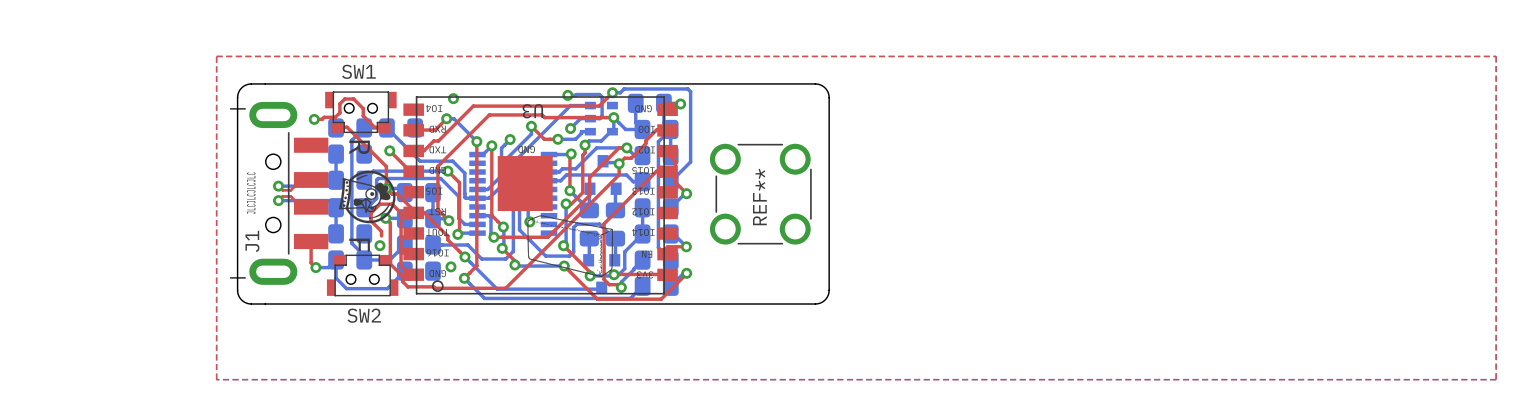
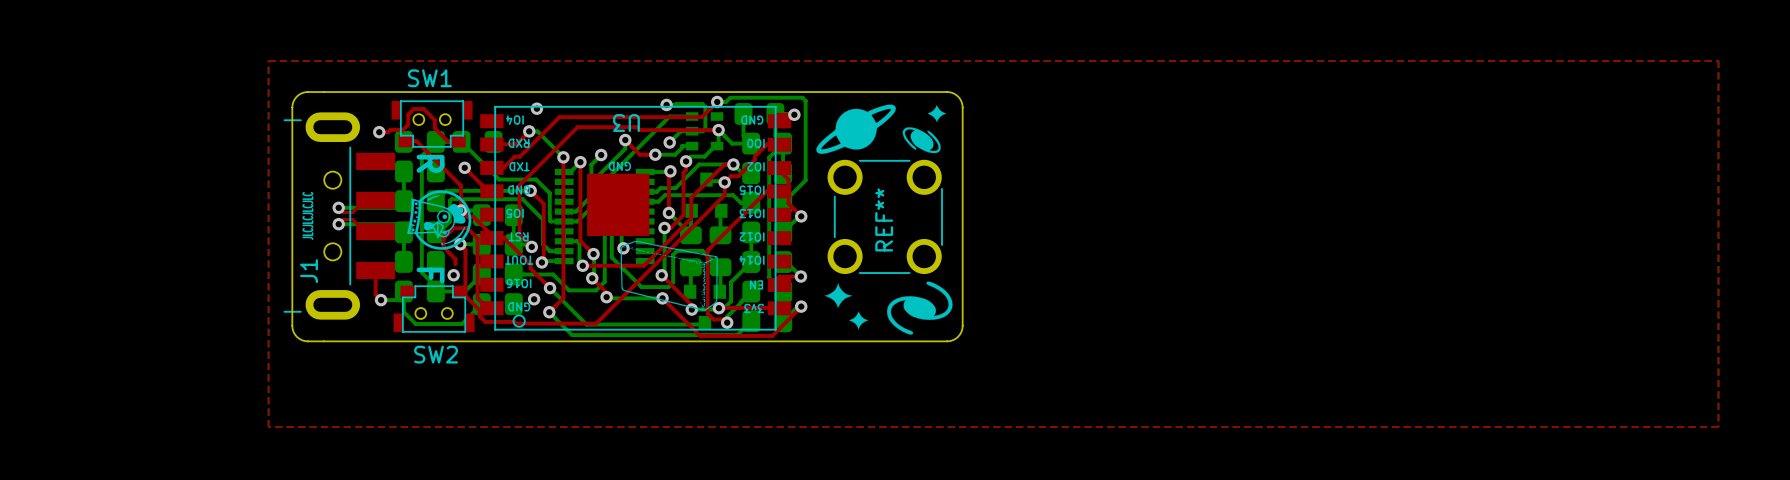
drawing: none -> [816, 104, 953, 335]

